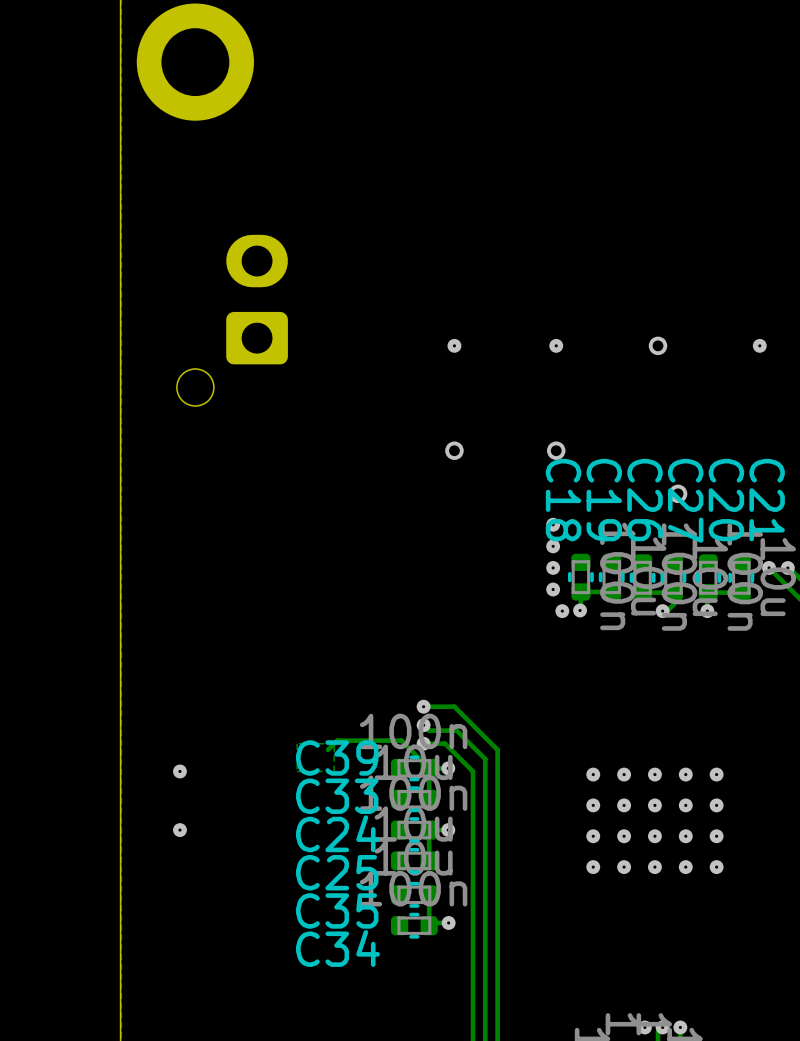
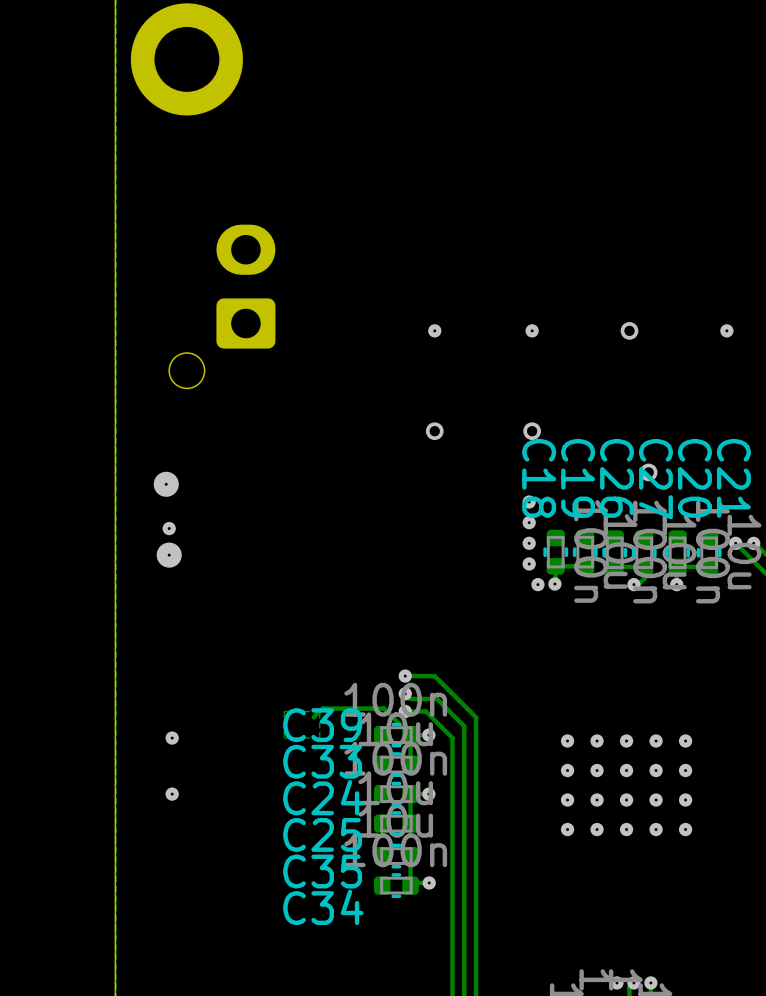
via: none -> (166, 484)
via: none -> (169, 528)
via: none -> (169, 555)

